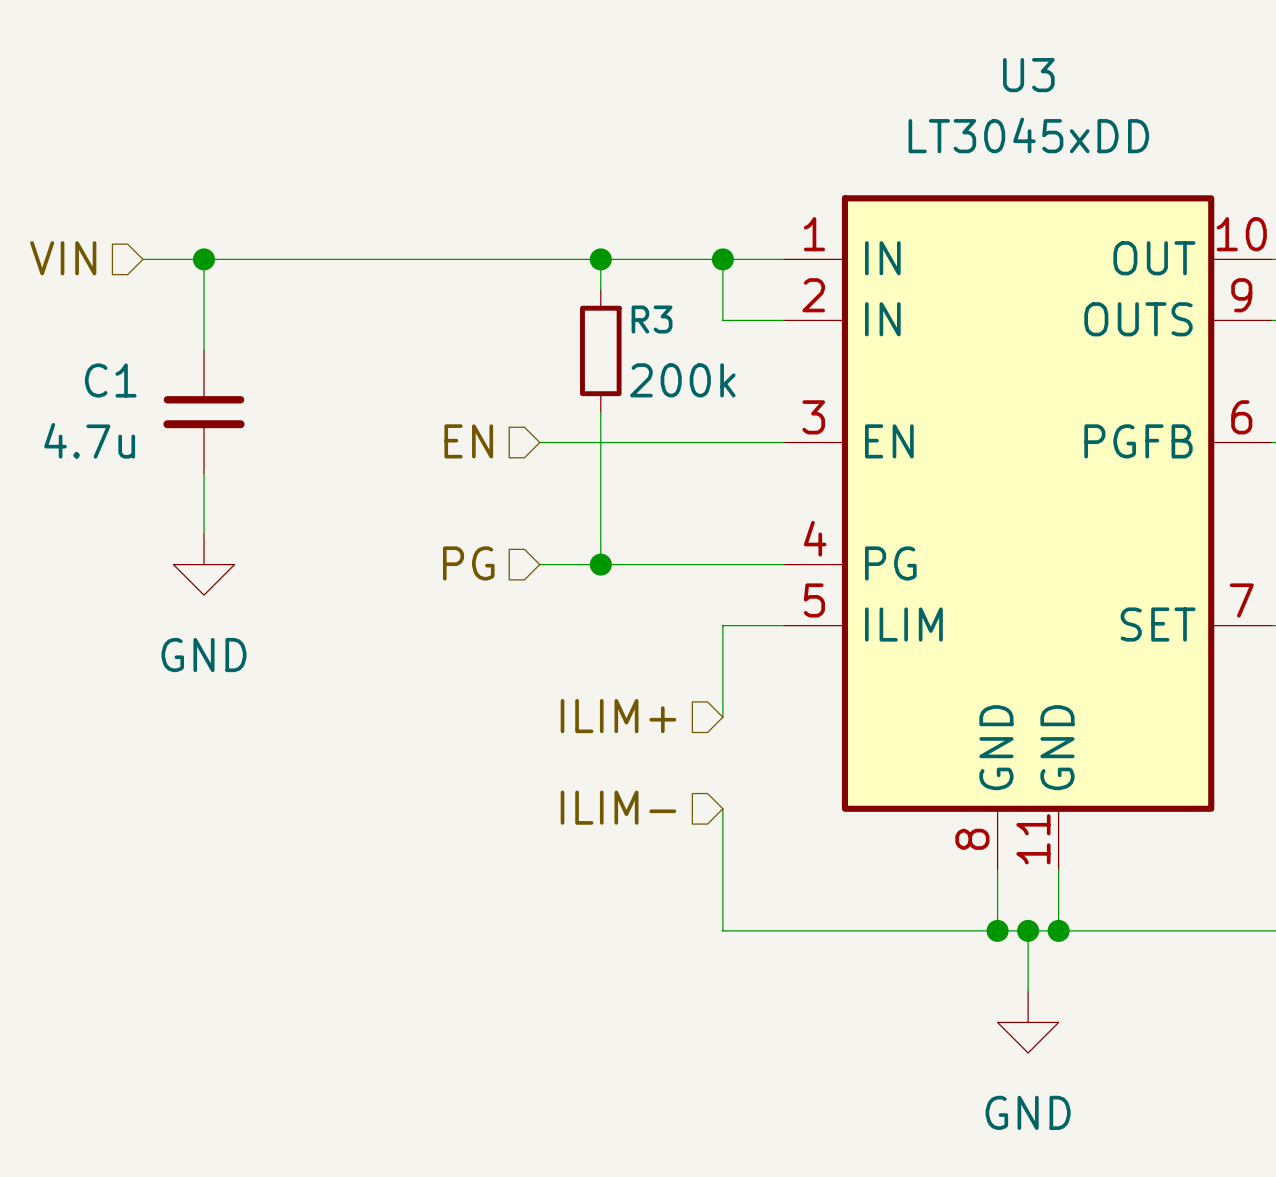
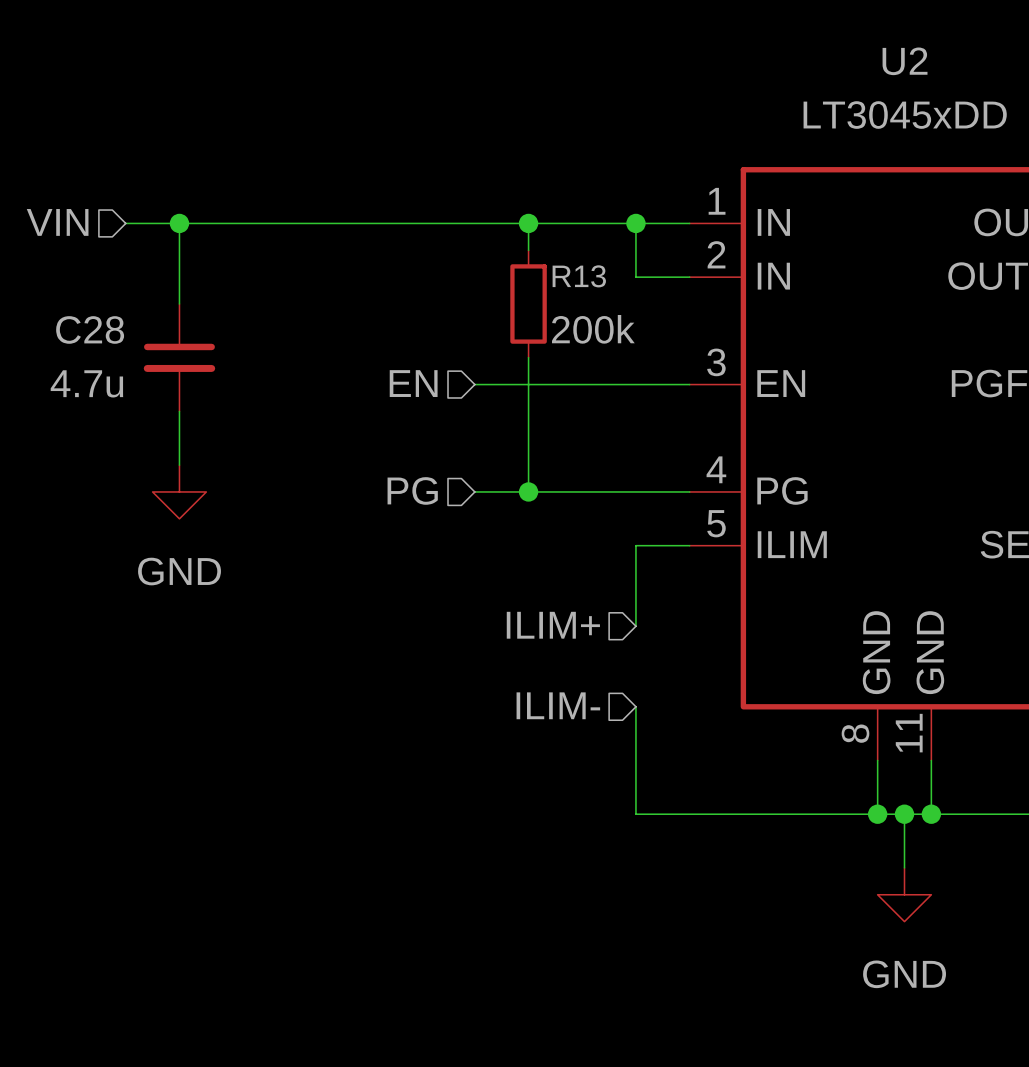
U3 name: U3 (1028, 75) -> U2 (905, 61)
R3 name: R3 (652, 319) -> R13 (579, 276)
C1 name: C1 (110, 380) -> C28 (90, 329)

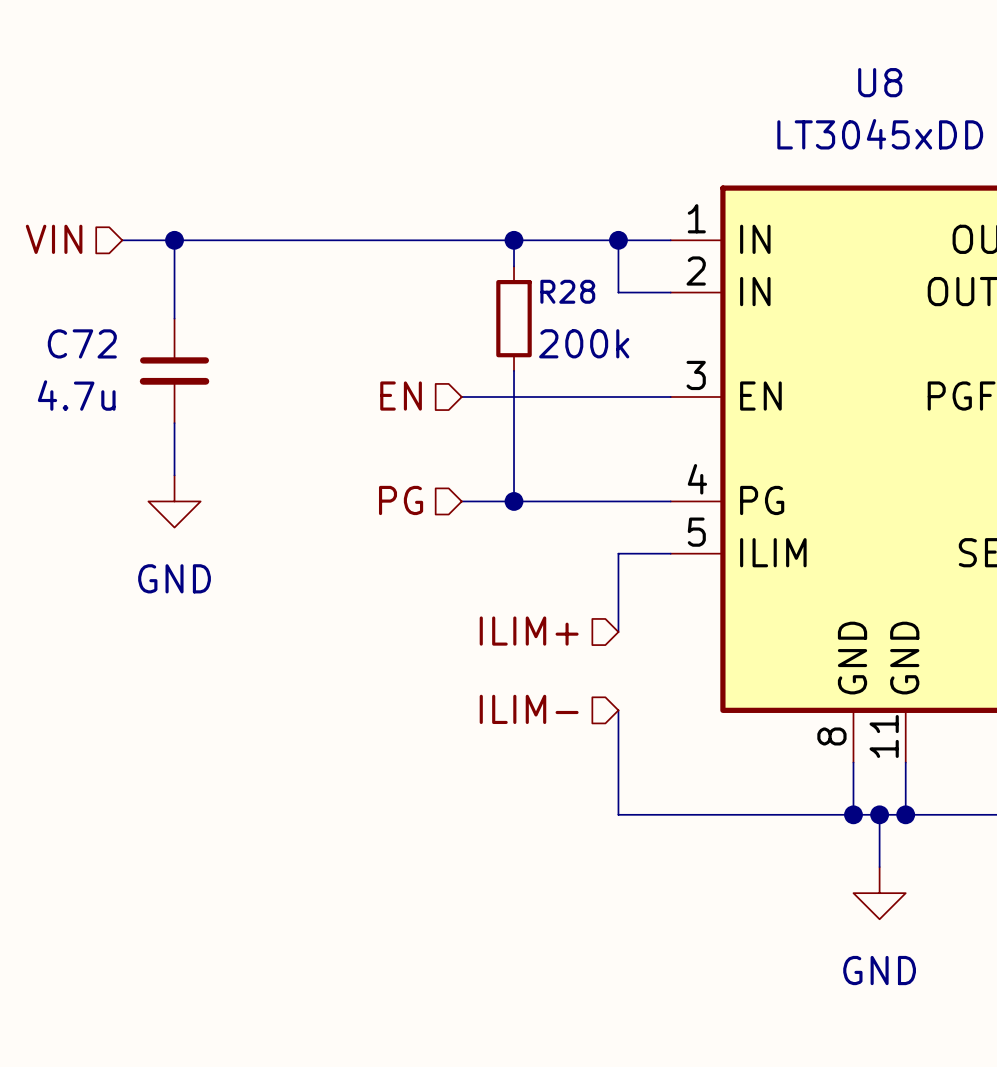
U2 name: U2 (905, 61) -> U8 (880, 82)
R13 name: R13 (579, 276) -> R28 (567, 291)
C28 name: C28 (90, 329) -> C72 (82, 343)

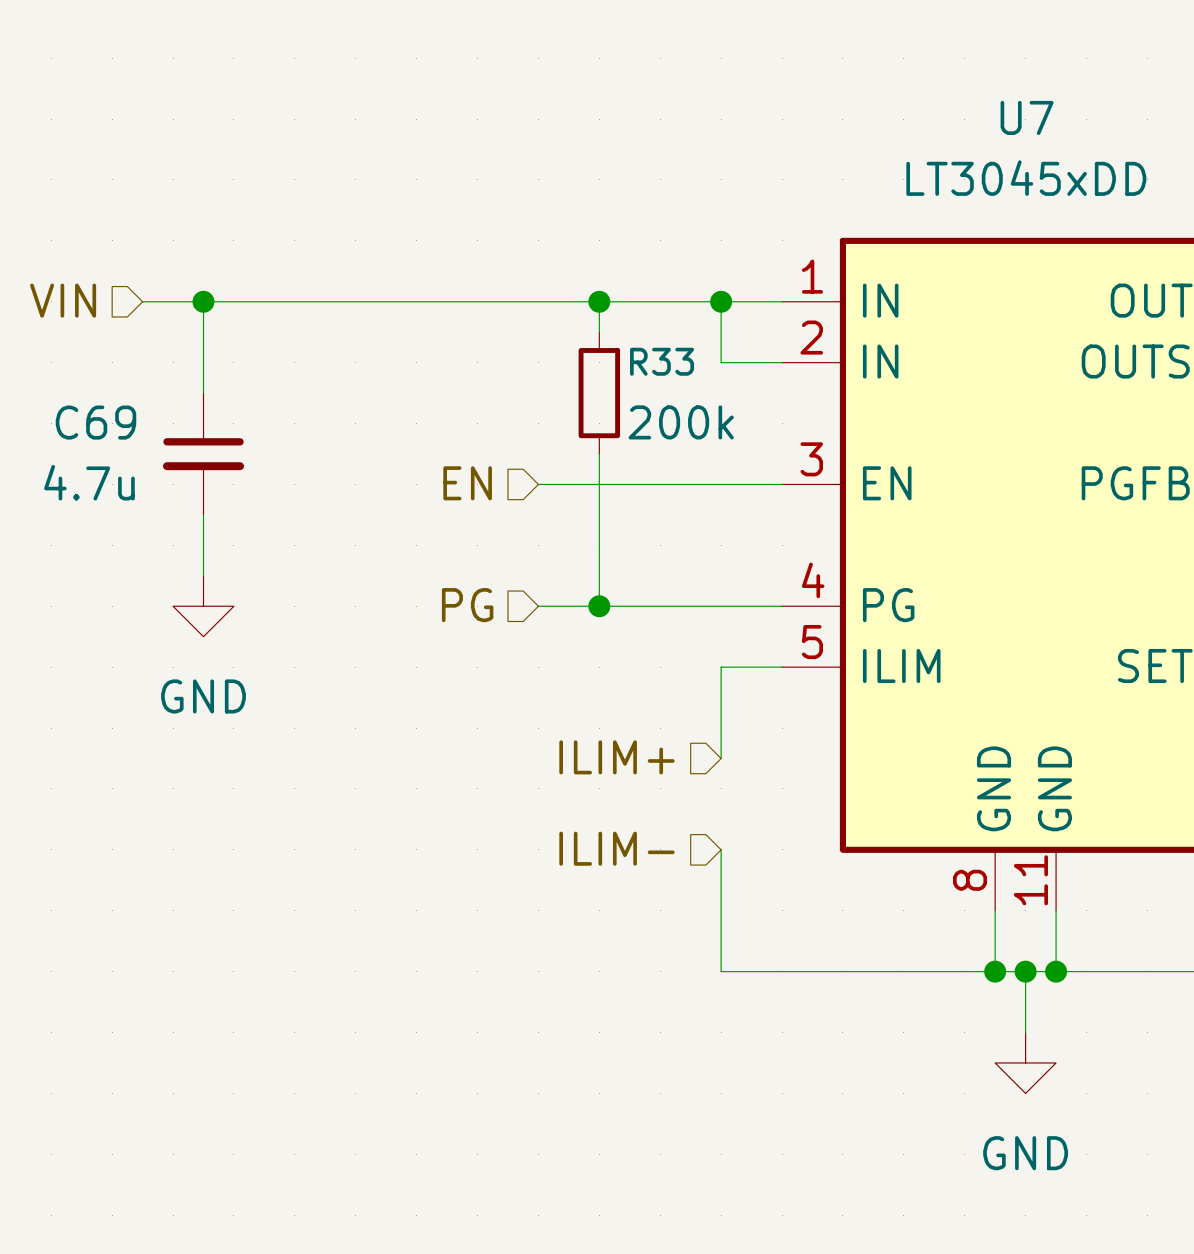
U8 name: U8 (880, 82) -> U7 (1027, 117)
R28 name: R28 (567, 291) -> R33 (662, 361)
C72 name: C72 (82, 343) -> C69 (95, 422)

